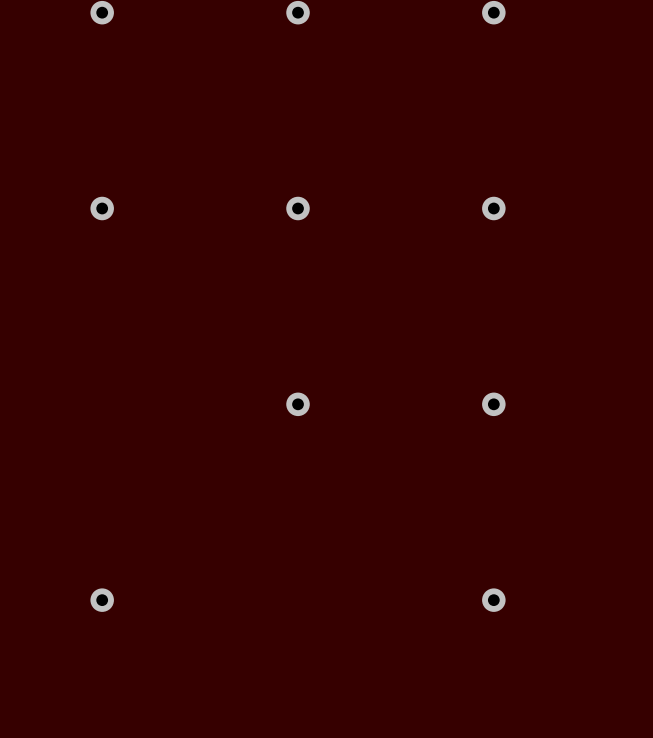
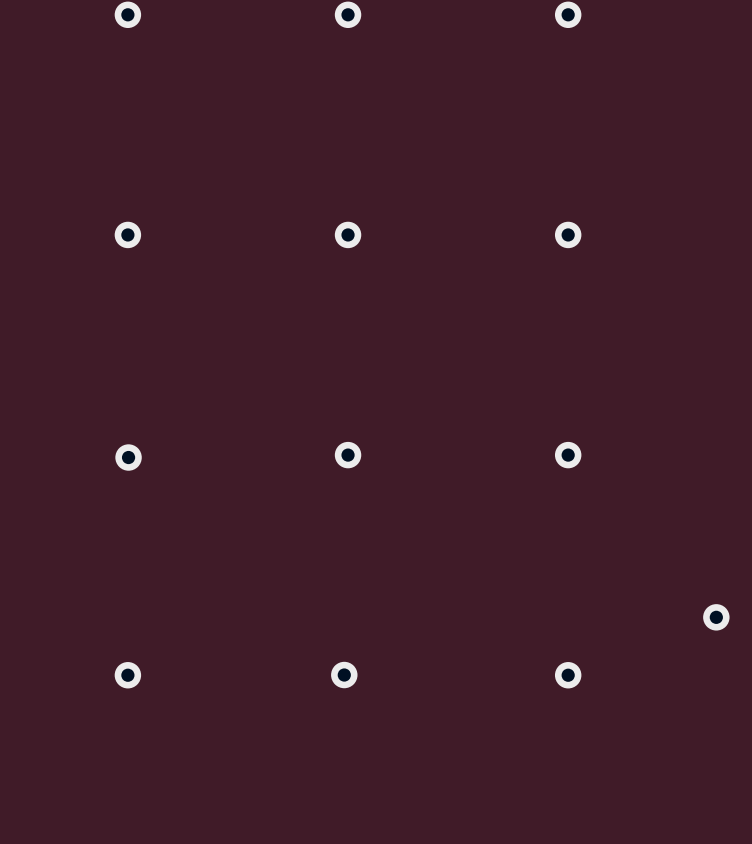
via: none -> (128, 457)
via: none -> (716, 617)
via: none -> (344, 675)

